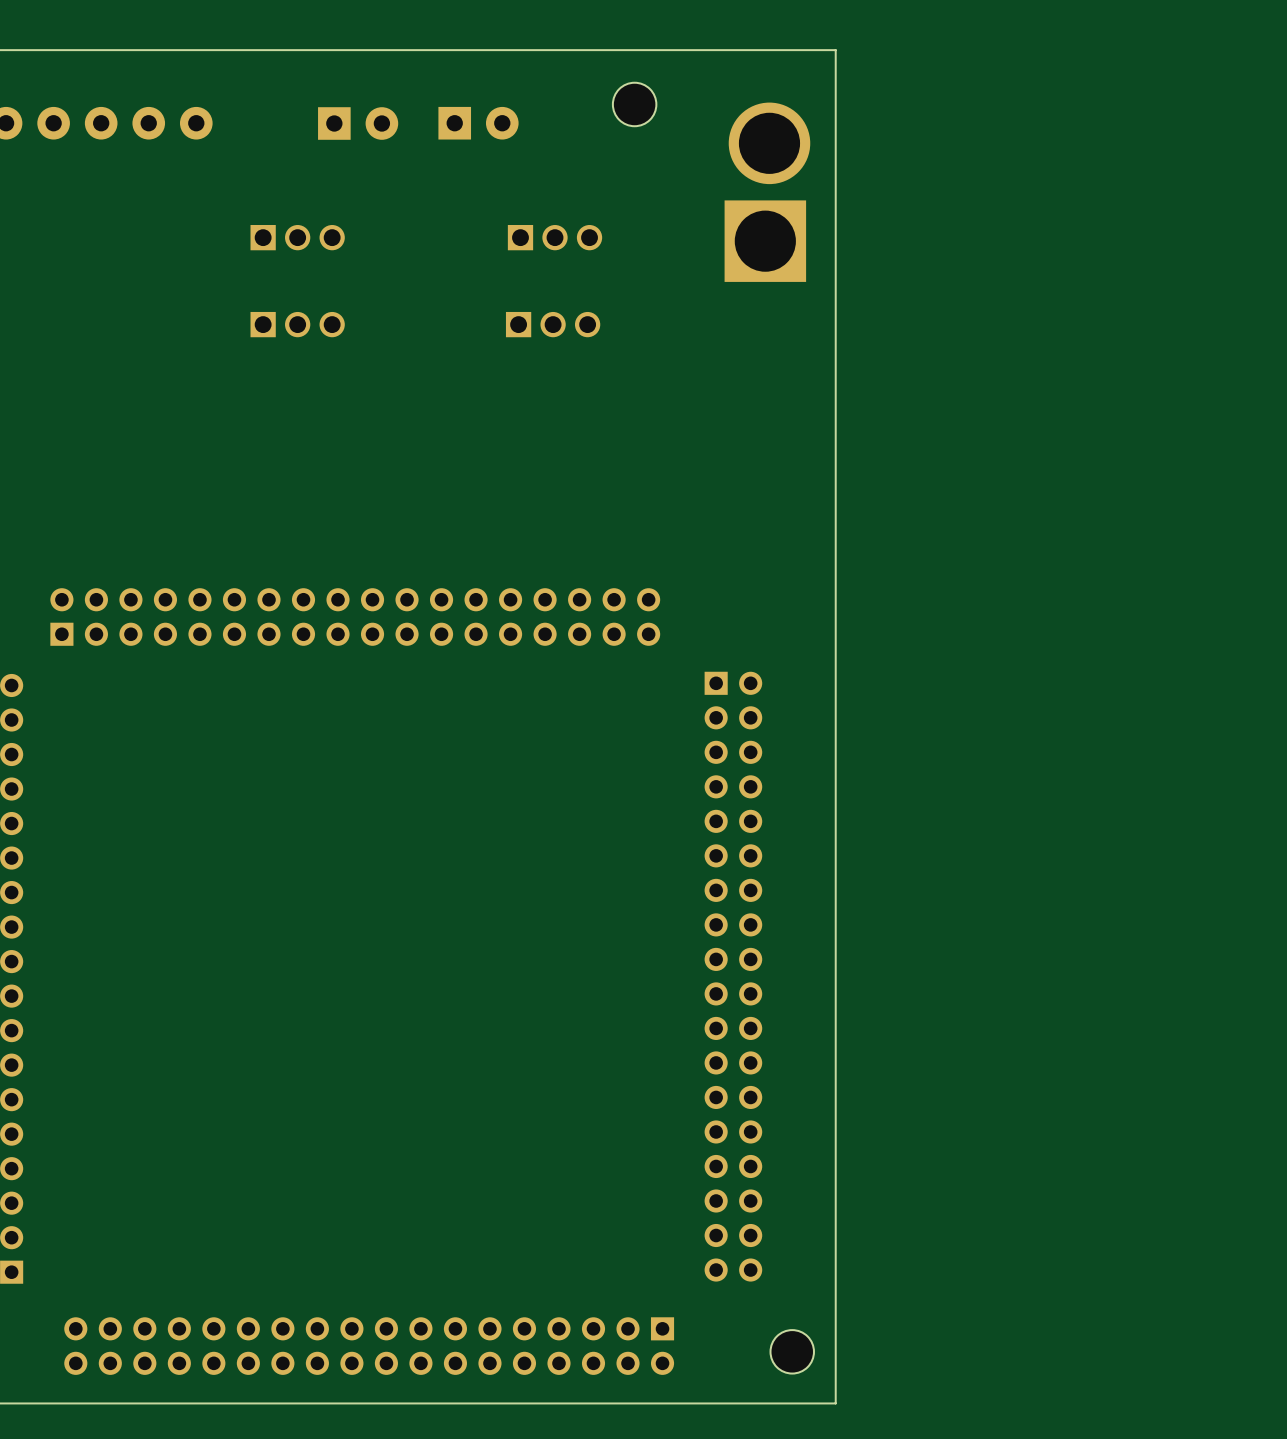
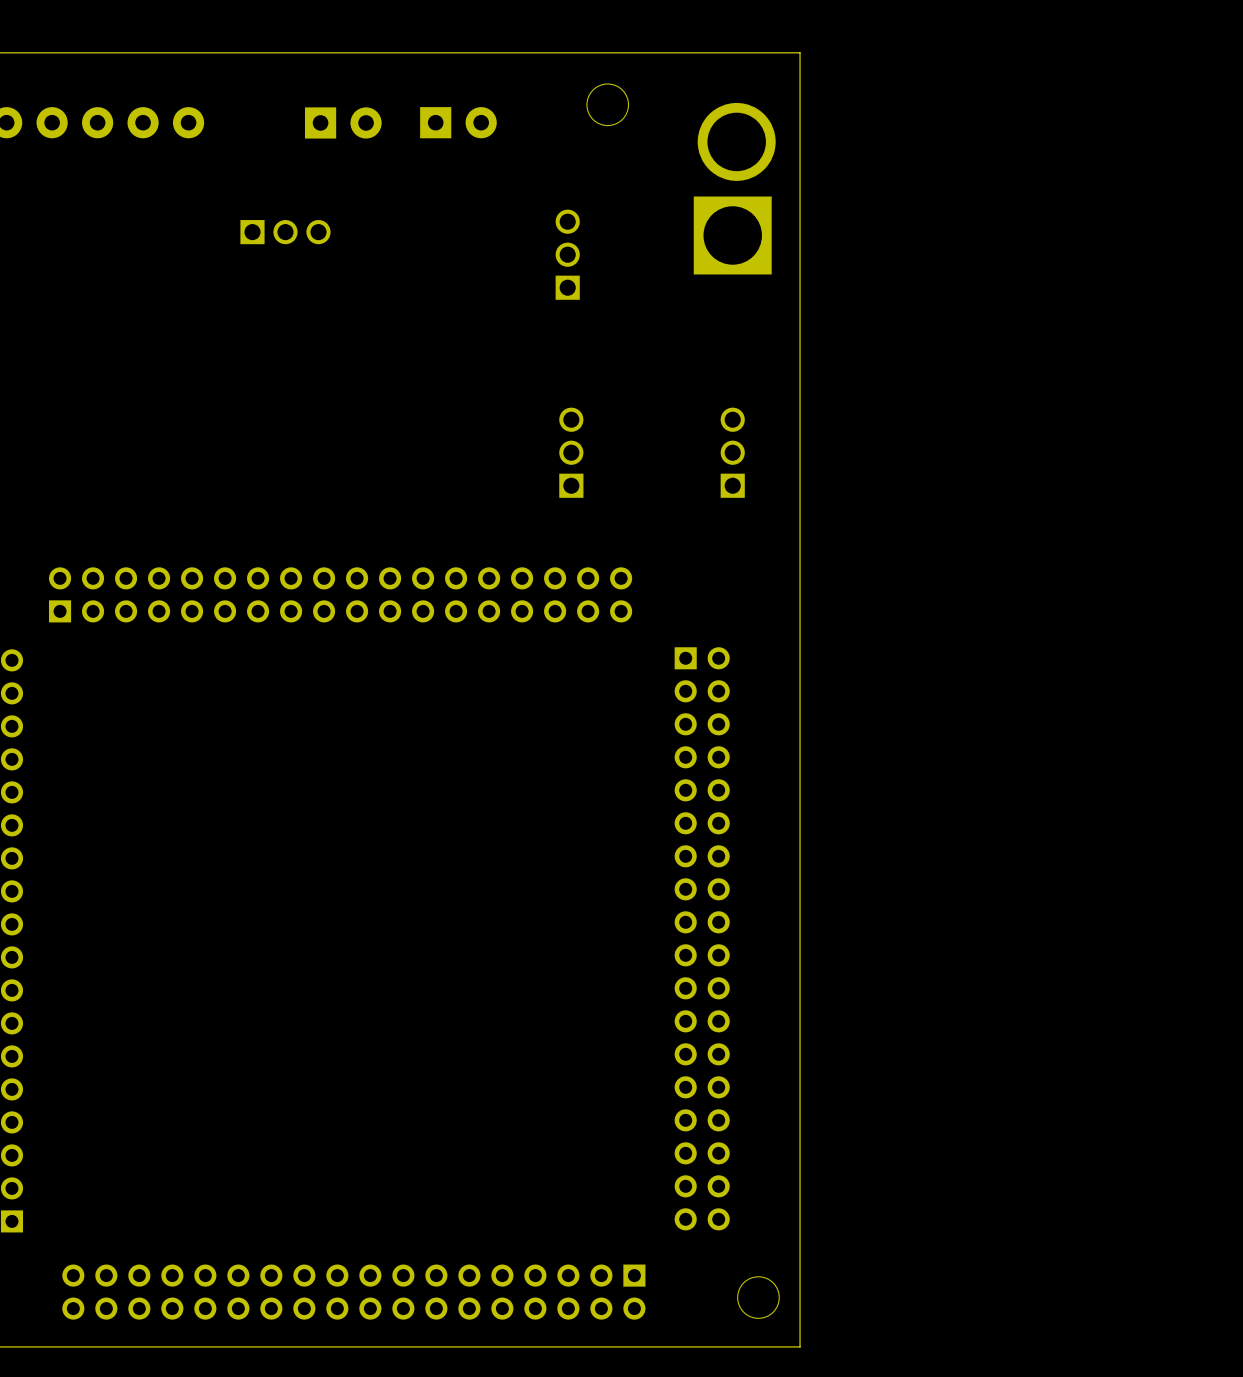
part: (555, 237) -> none
part: none -> (567, 254)
part: (297, 324) -> none
part: (553, 324) -> none
part: none -> (571, 452)
part: none -> (732, 452)

